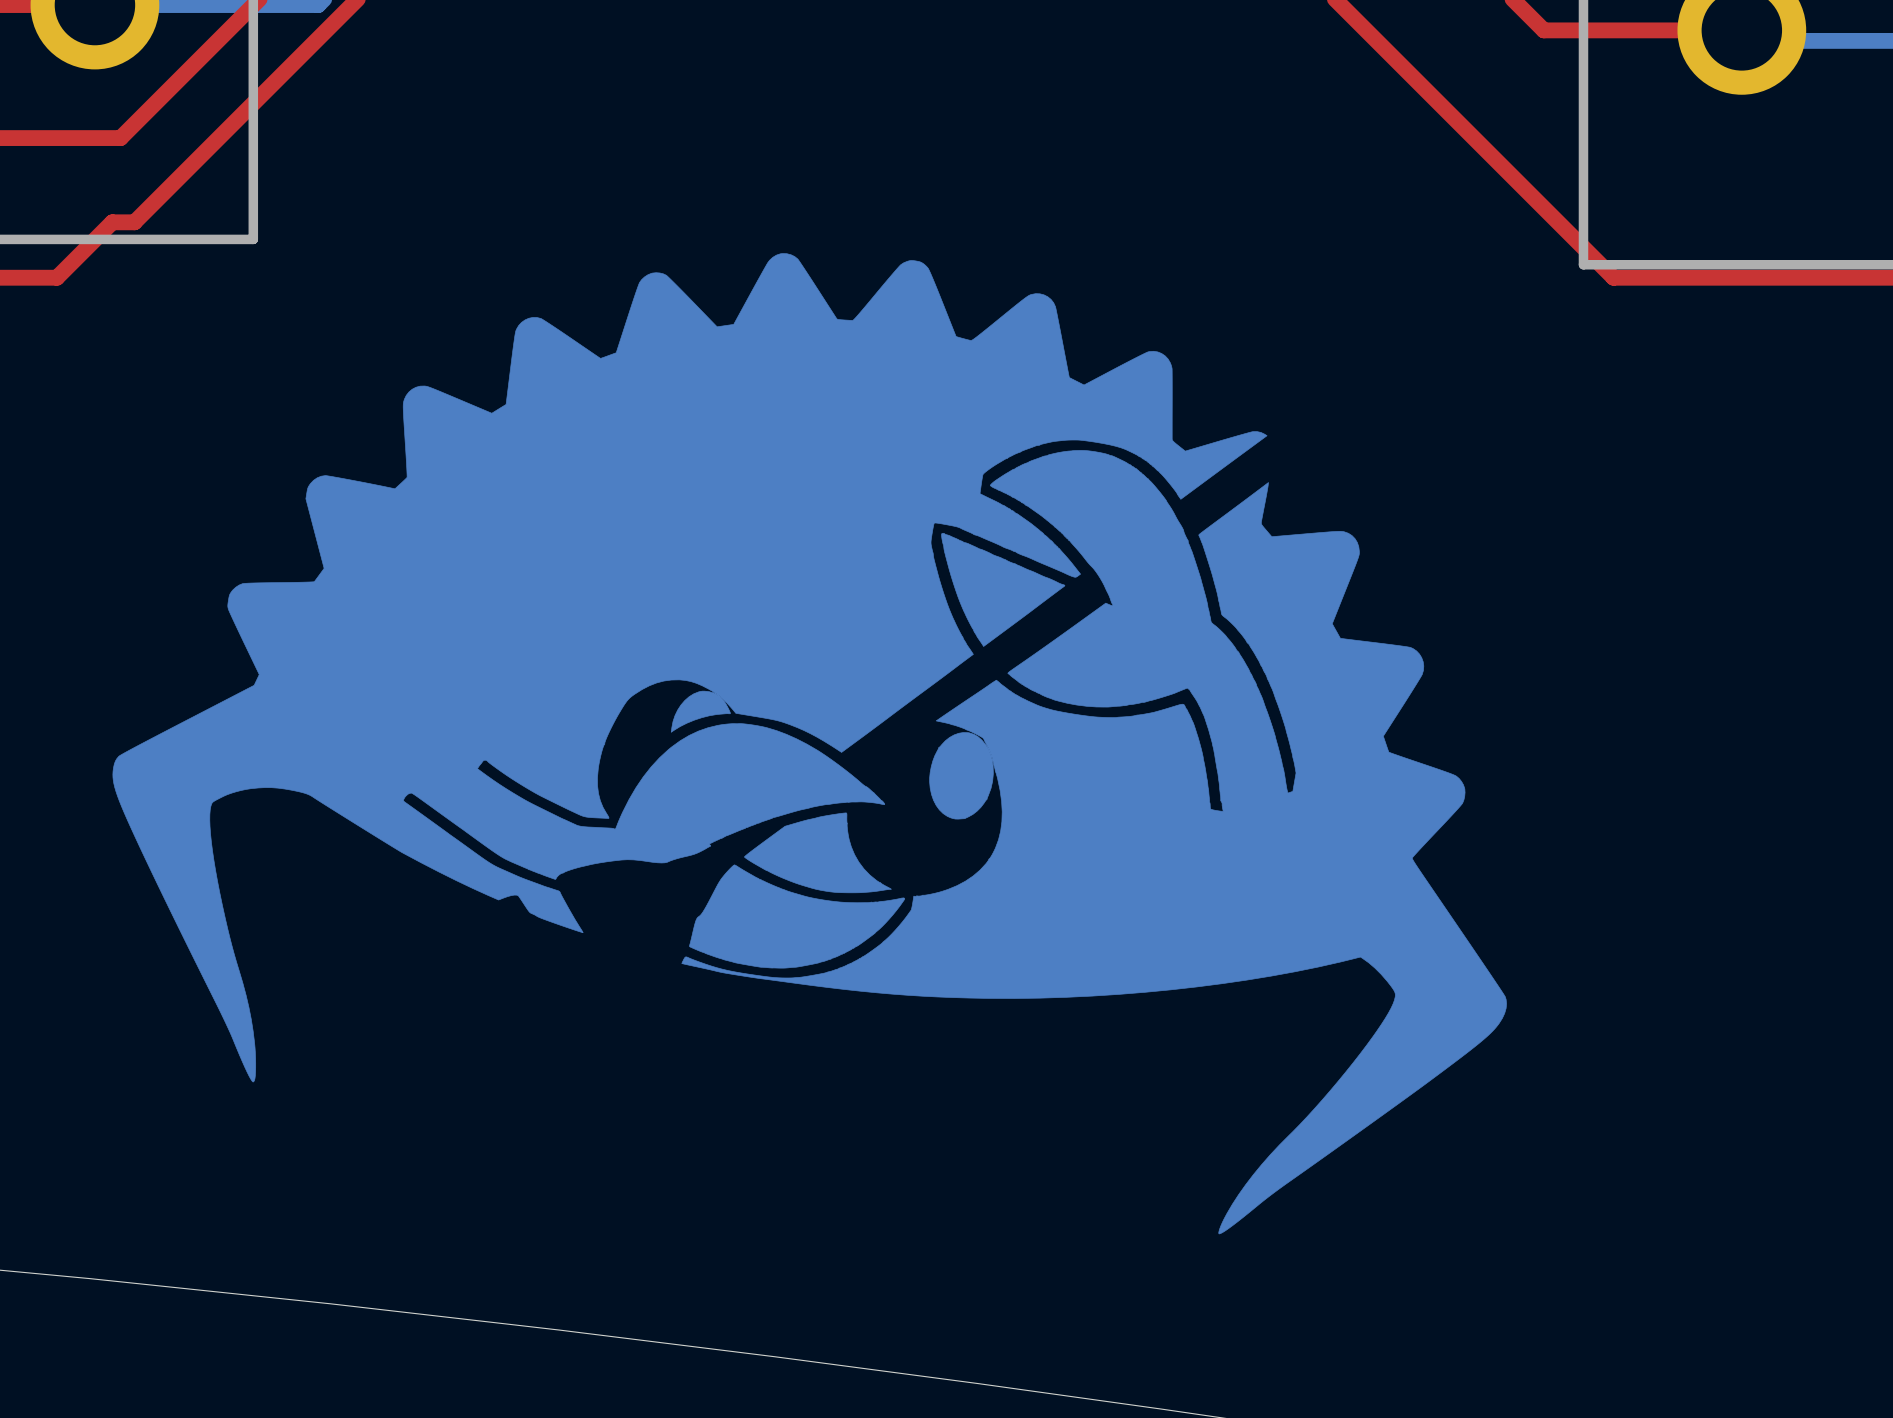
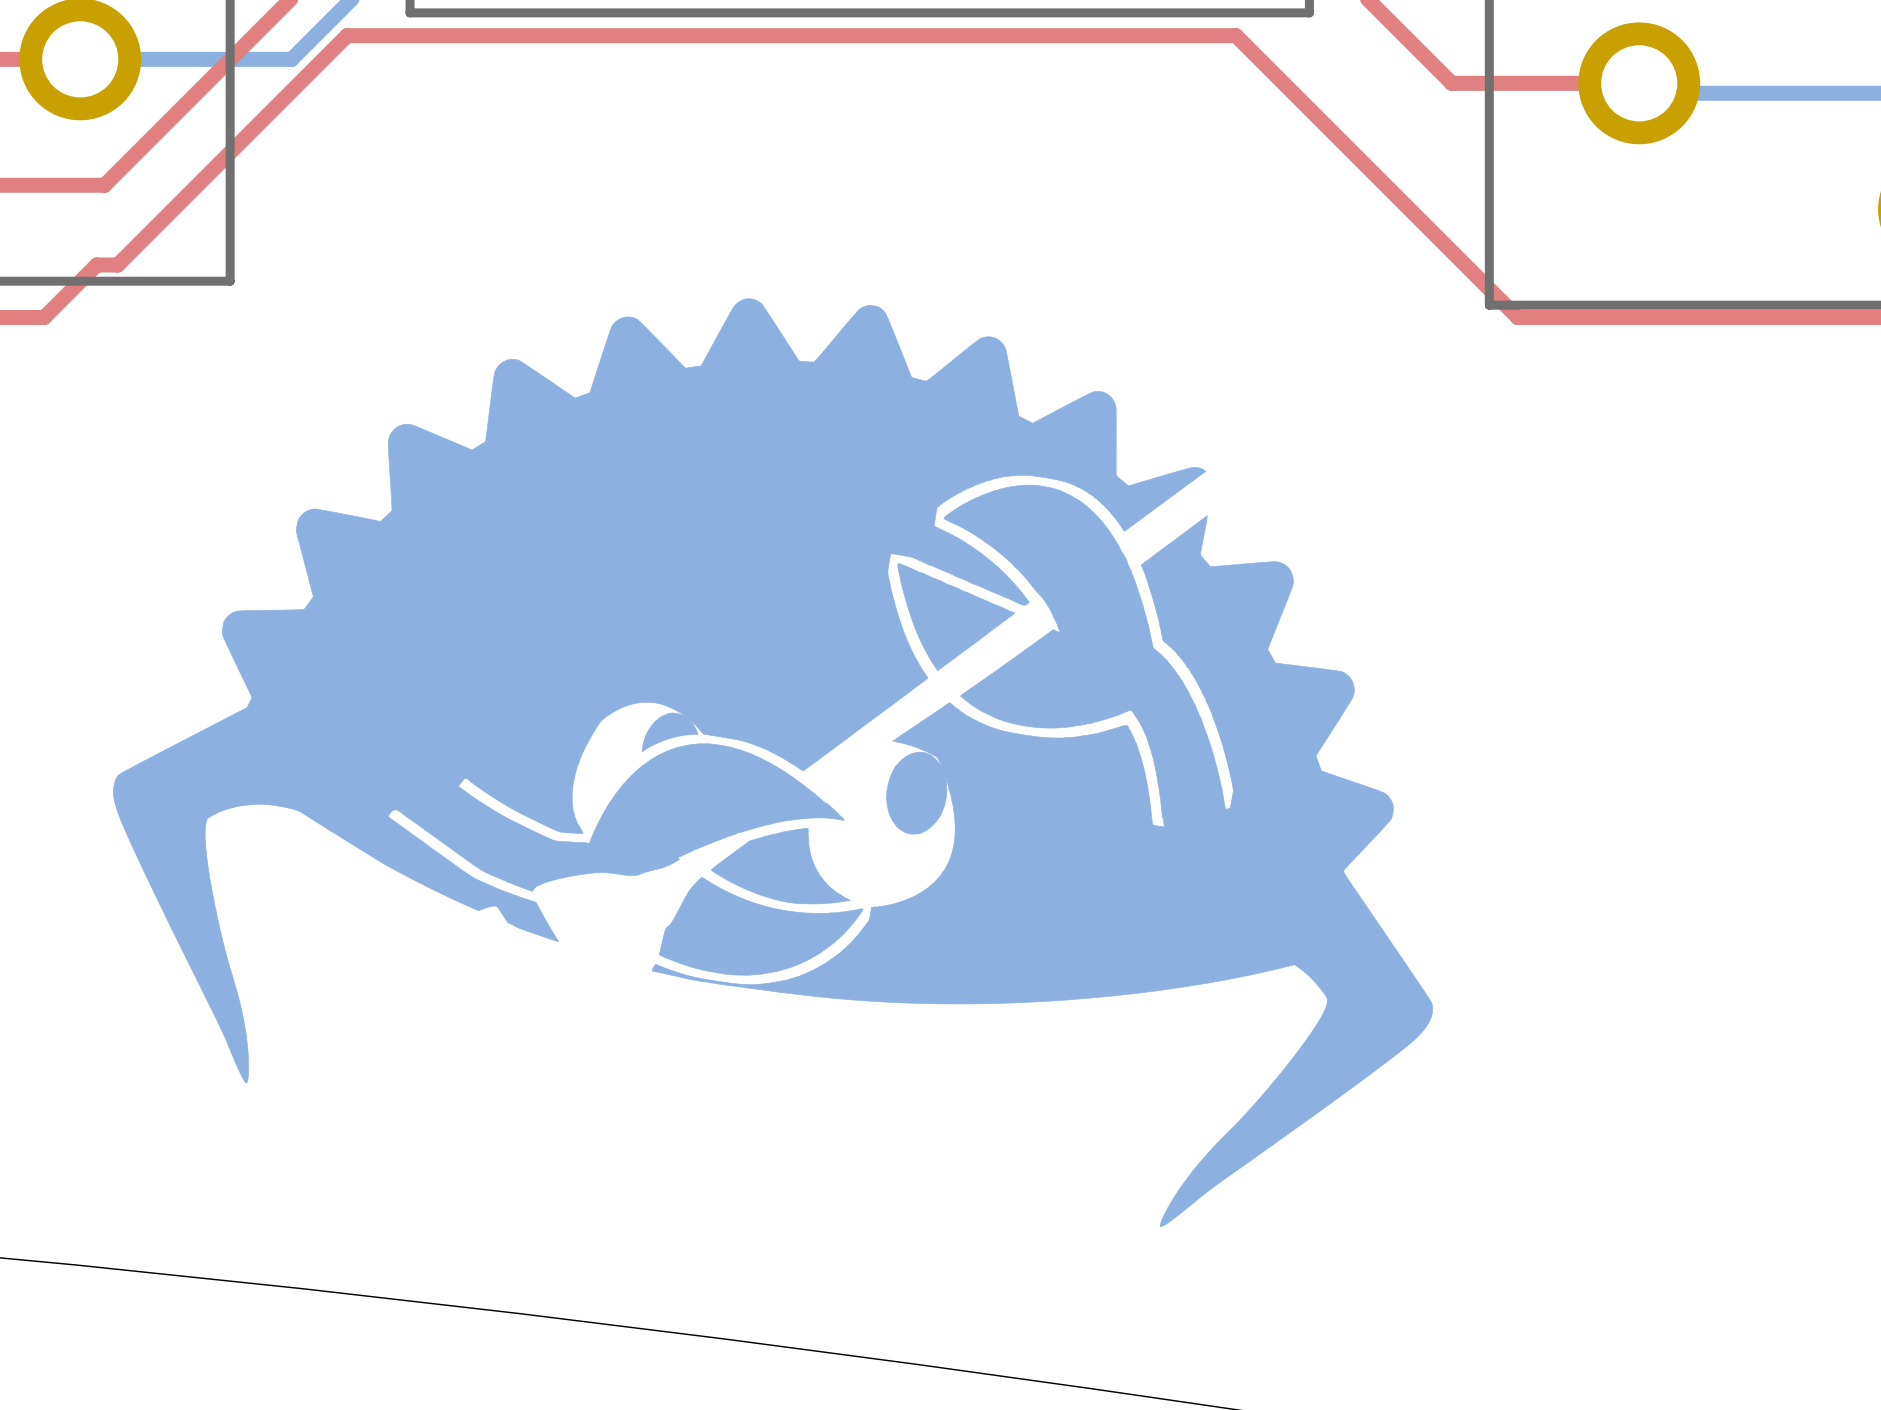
drawing position: (809, 743) -> (773, 762)

